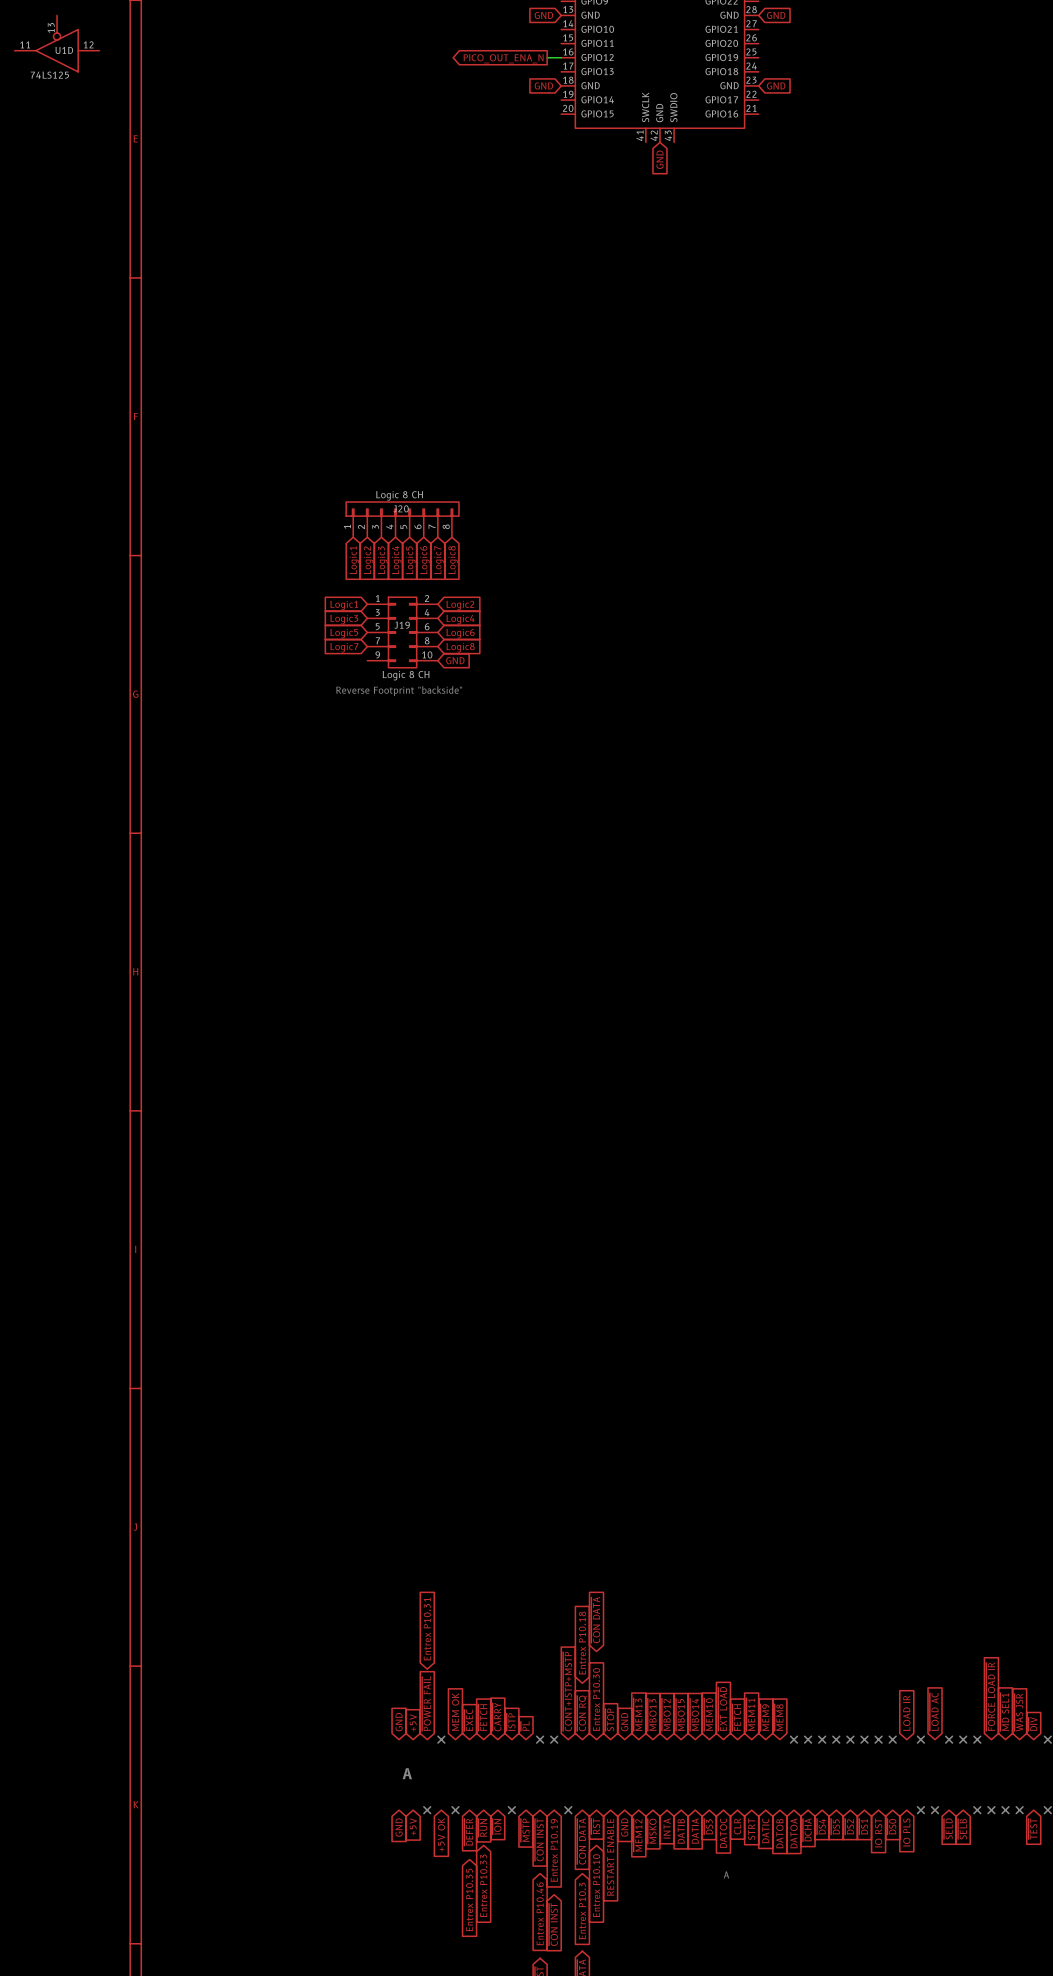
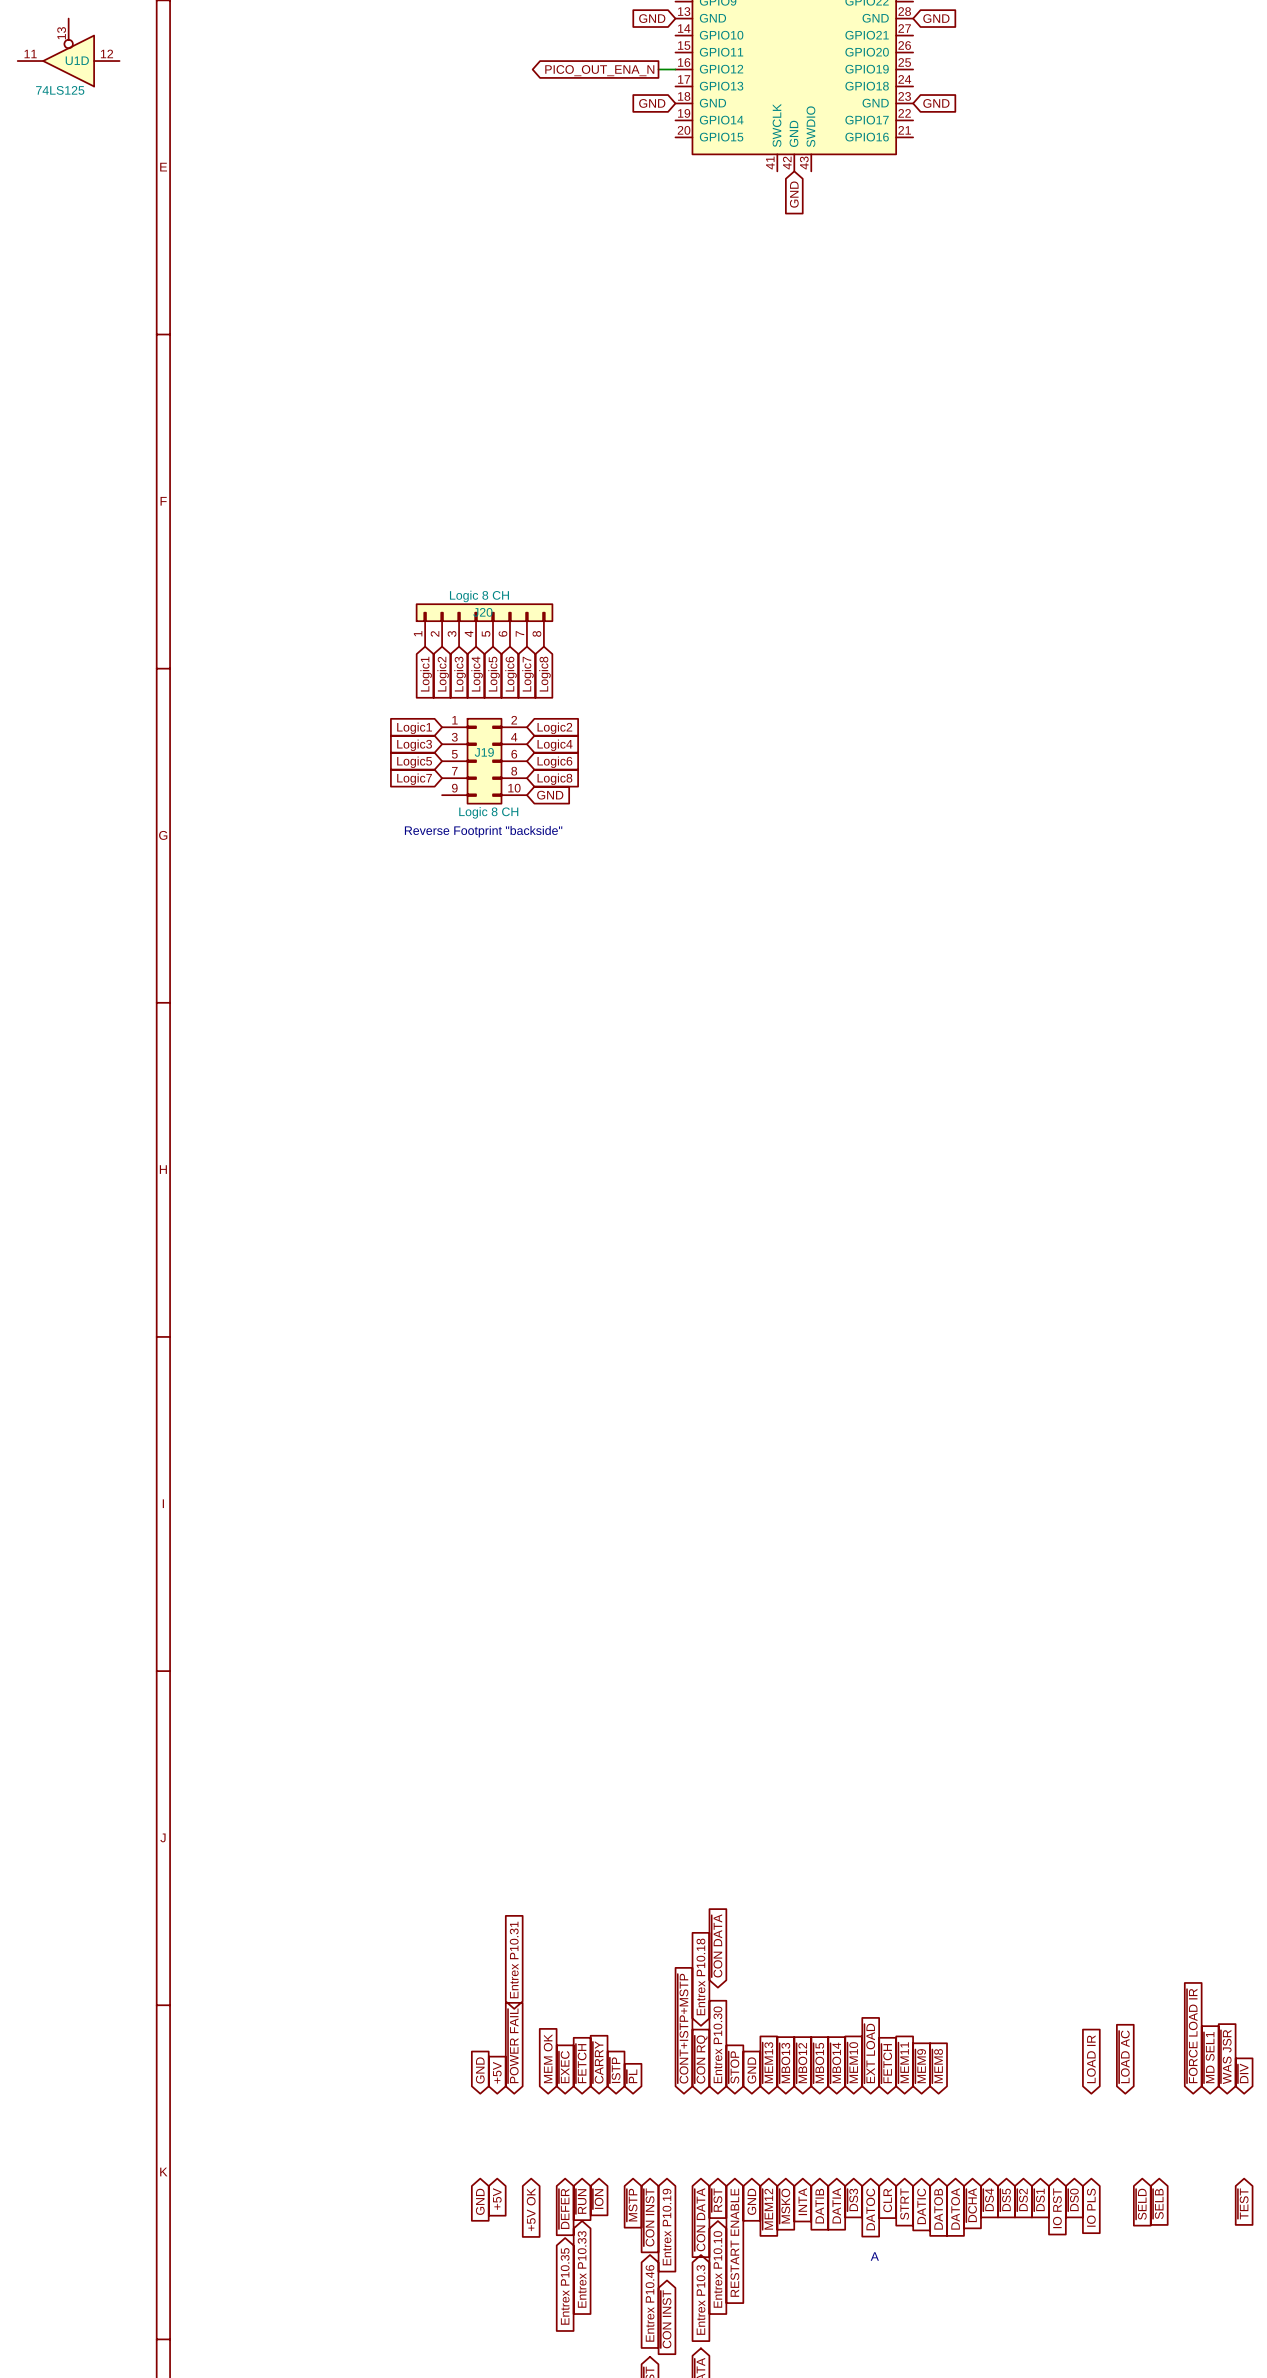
no-connect mark: (441, 1739) -> none
no-connect mark: (540, 1739) -> none
no-connect mark: (554, 1739) -> none
no-connect mark: (793, 1739) -> none
no-connect mark: (808, 1739) -> none
no-connect mark: (822, 1739) -> none
no-connect mark: (836, 1739) -> none
no-connect mark: (850, 1739) -> none
no-connect mark: (864, 1739) -> none
no-connect mark: (878, 1739) -> none
no-connect mark: (892, 1739) -> none
no-connect mark: (920, 1739) -> none
no-connect mark: (949, 1739) -> none
no-connect mark: (963, 1739) -> none
no-connect mark: (977, 1739) -> none
no-connect mark: (1047, 1739) -> none
text: A (407, 1773) -> none
no-connect mark: (427, 1810) -> none
no-connect mark: (455, 1810) -> none
no-connect mark: (511, 1810) -> none
no-connect mark: (568, 1810) -> none
no-connect mark: (920, 1810) -> none
no-connect mark: (935, 1810) -> none
no-connect mark: (977, 1810) -> none
no-connect mark: (991, 1810) -> none
no-connect mark: (1005, 1810) -> none
no-connect mark: (1019, 1810) -> none
no-connect mark: (1047, 1810) -> none

